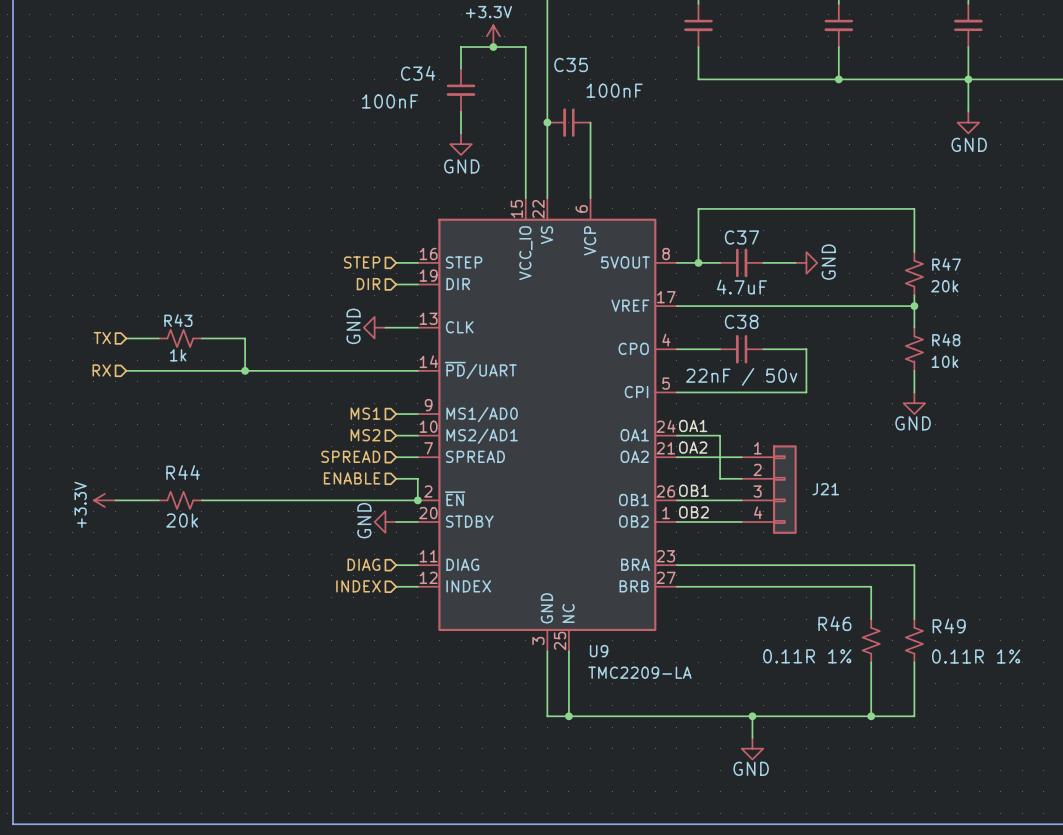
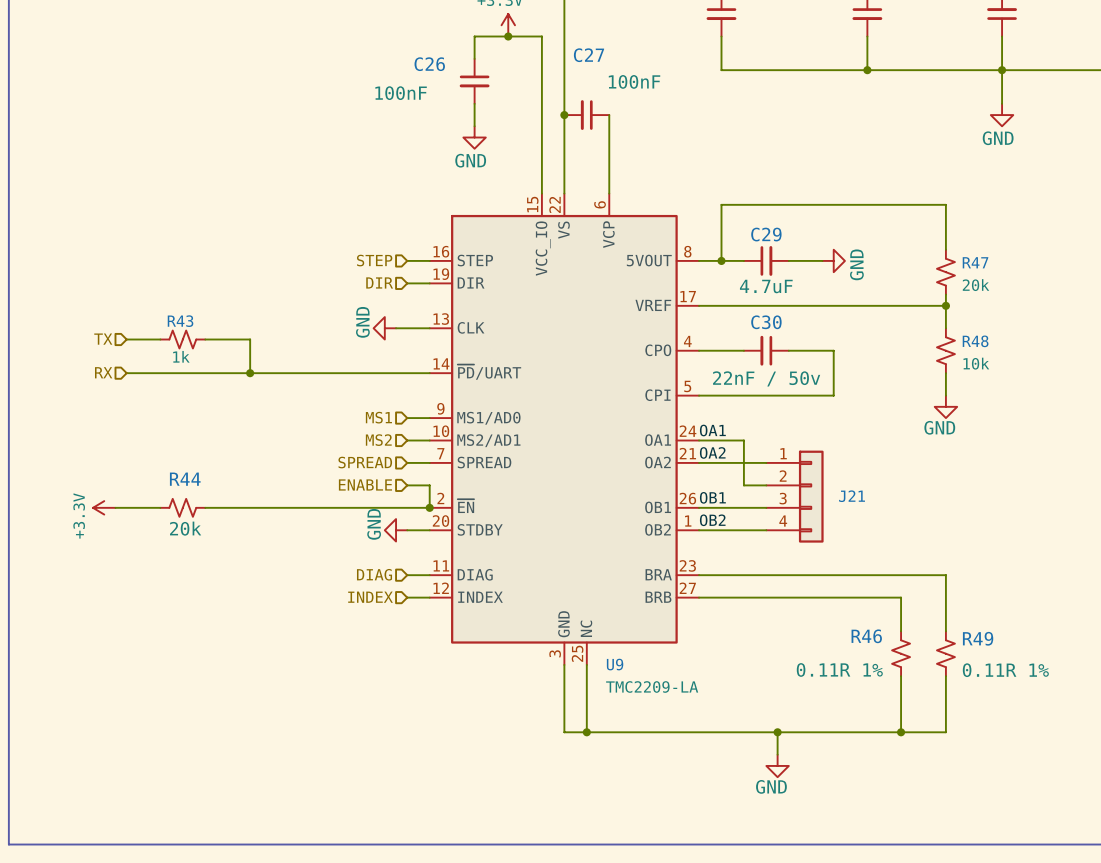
C35 name: C35 (571, 64) -> C27 (589, 55)
C34 name: C34 (418, 73) -> C26 (429, 64)
C37 name: C37 (741, 237) -> C29 (766, 234)
C38 name: C38 (741, 321) -> C30 (766, 322)

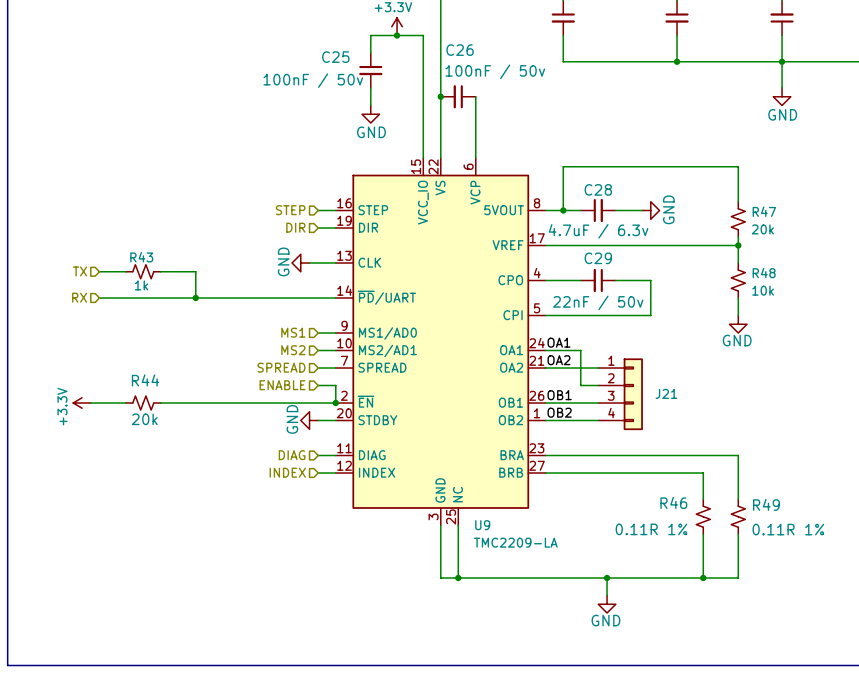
C27 name: C27 (589, 55) -> C26 (460, 50)
C26 name: C26 (429, 64) -> C25 (335, 57)
C27 value: 100nF (634, 81) -> 100nF / 50v (495, 71)
C26 value: 100nF (401, 93) -> 100nF / 50v (313, 80)
C29 name: C29 (766, 234) -> C28 (598, 189)
C29 value: 4.7uF (766, 286) -> 4.7uF / 6.3v (598, 231)
C30 name: C30 (766, 322) -> C29 (598, 258)

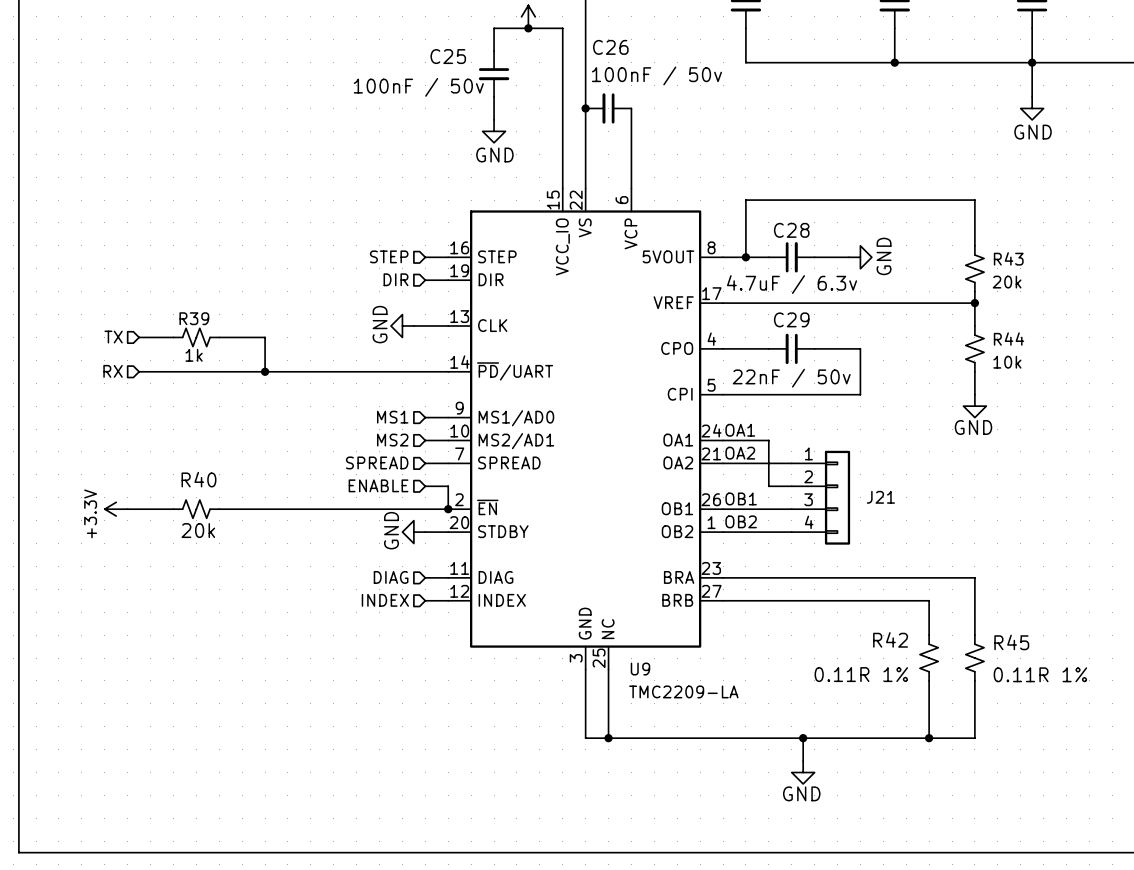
R47 name: R47 (764, 211) -> R43 (1008, 258)
R43 name: R43 (141, 257) -> R39 (194, 318)
R48 name: R48 (764, 272) -> R44 (1009, 339)
R44 name: R44 (145, 380) -> R40 (198, 479)
R46 name: R46 (673, 502) -> R42 (890, 639)
R49 name: R49 (766, 504) -> R45 (1011, 642)

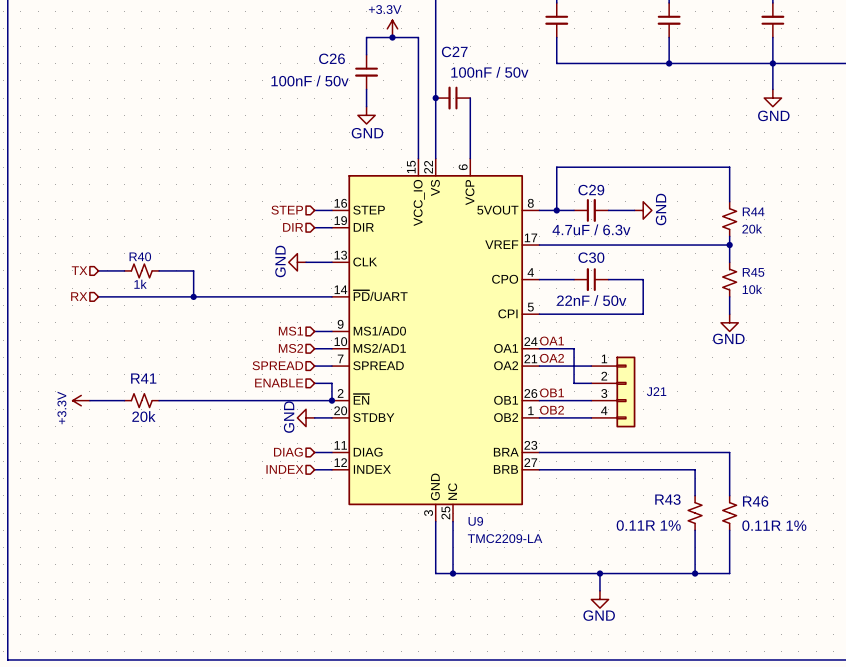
C26 name: C26 (610, 47) -> C27 (454, 51)
C25 name: C25 (448, 56) -> C26 (332, 58)
C28 name: C28 (791, 230) -> C29 (591, 190)
R43 name: R43 (1008, 258) -> R44 (753, 211)
R39 name: R39 (194, 318) -> R40 (140, 256)
C29 name: C29 (791, 319) -> C30 (591, 257)
R44 name: R44 (1009, 339) -> R45 (753, 272)
R40 name: R40 (198, 479) -> R41 (143, 378)
R42 name: R42 (890, 639) -> R43 (667, 499)
R45 name: R45 (1011, 642) -> R46 (755, 501)

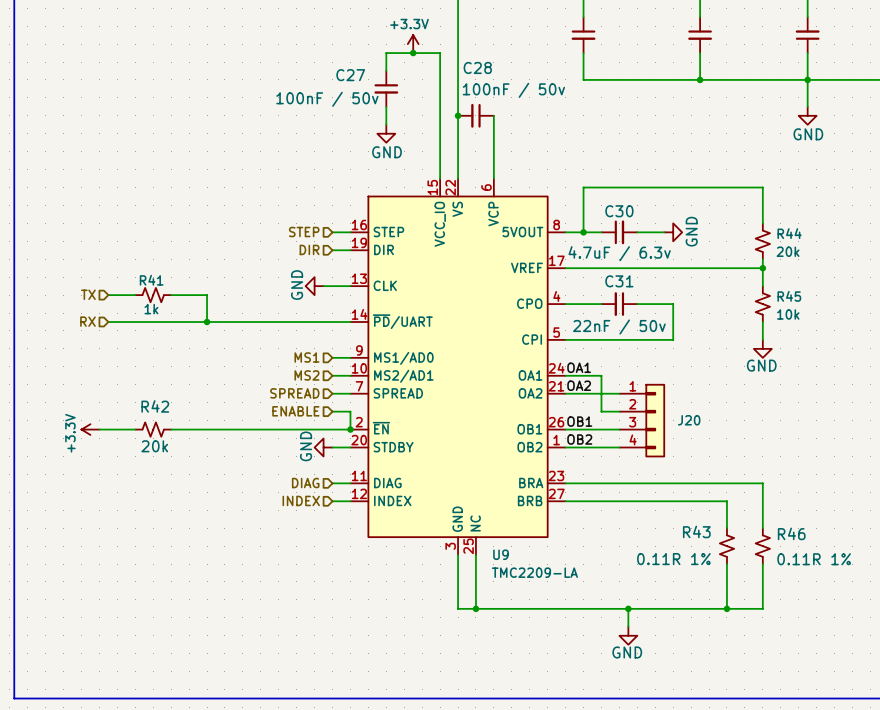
C27 name: C27 (454, 51) -> C28 (477, 67)
C26 name: C26 (332, 58) -> C27 (350, 75)
C29 name: C29 (591, 190) -> C30 (619, 211)
R40 name: R40 (140, 256) -> R41 (151, 280)
C30 name: C30 (591, 257) -> C31 (619, 281)
R41 name: R41 (143, 378) -> R42 (155, 406)
J21 name: J21 (656, 391) -> J20 (689, 420)

